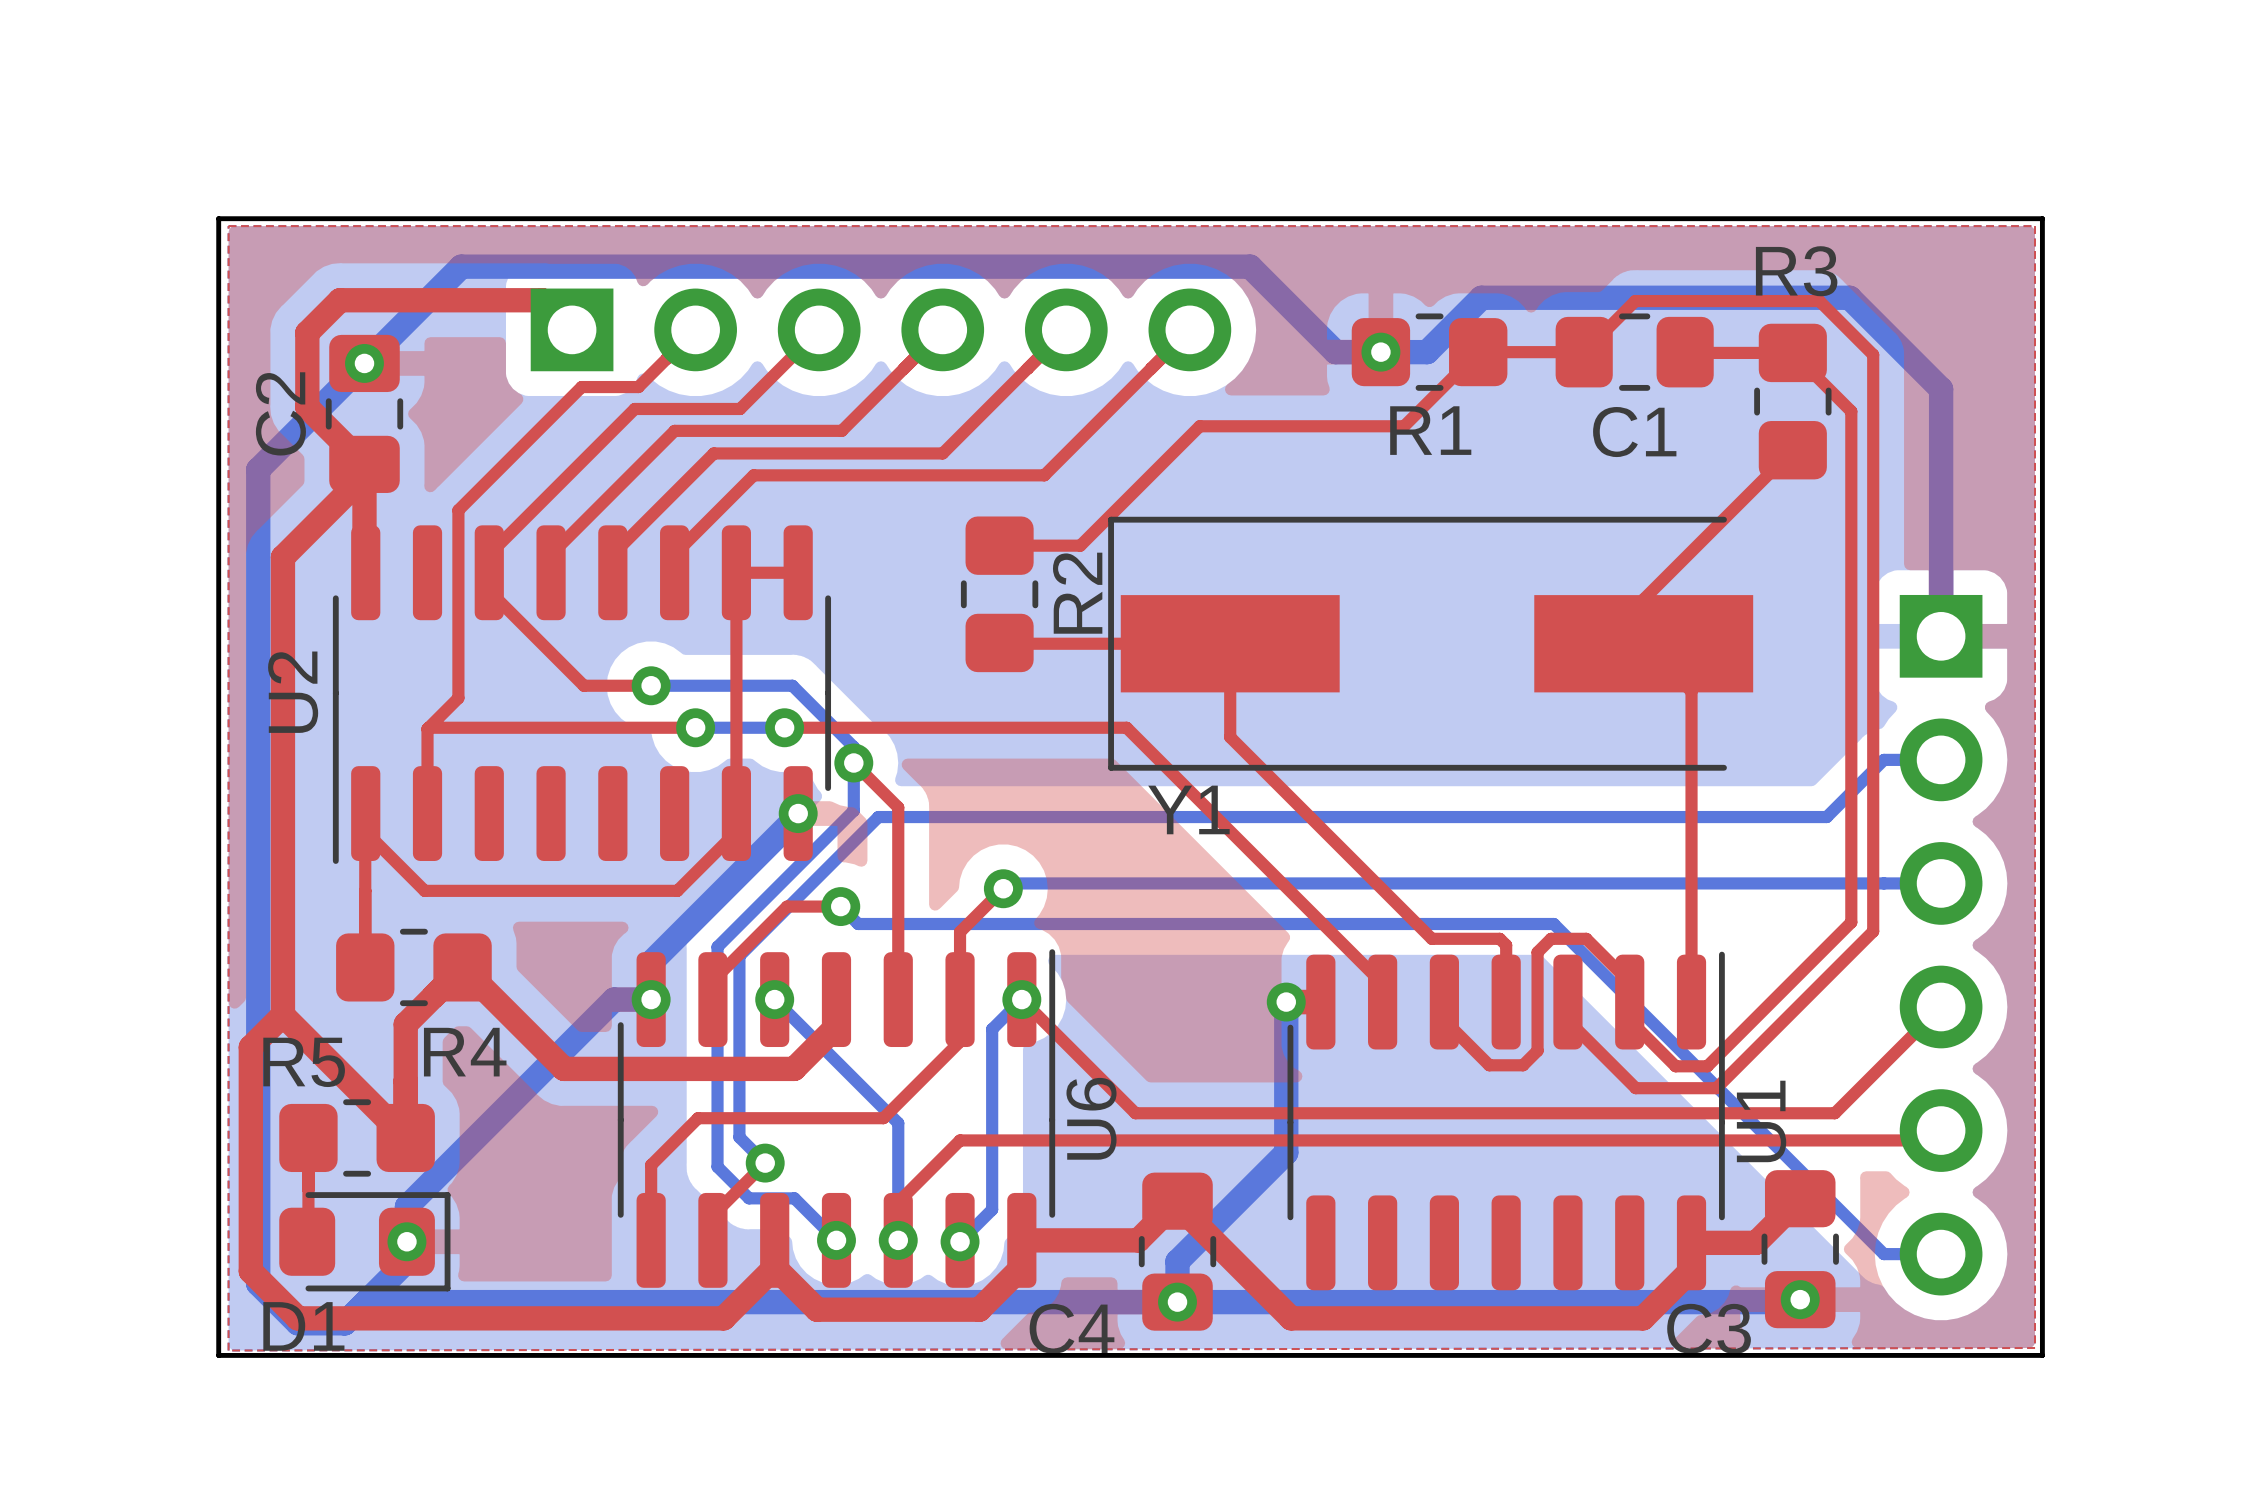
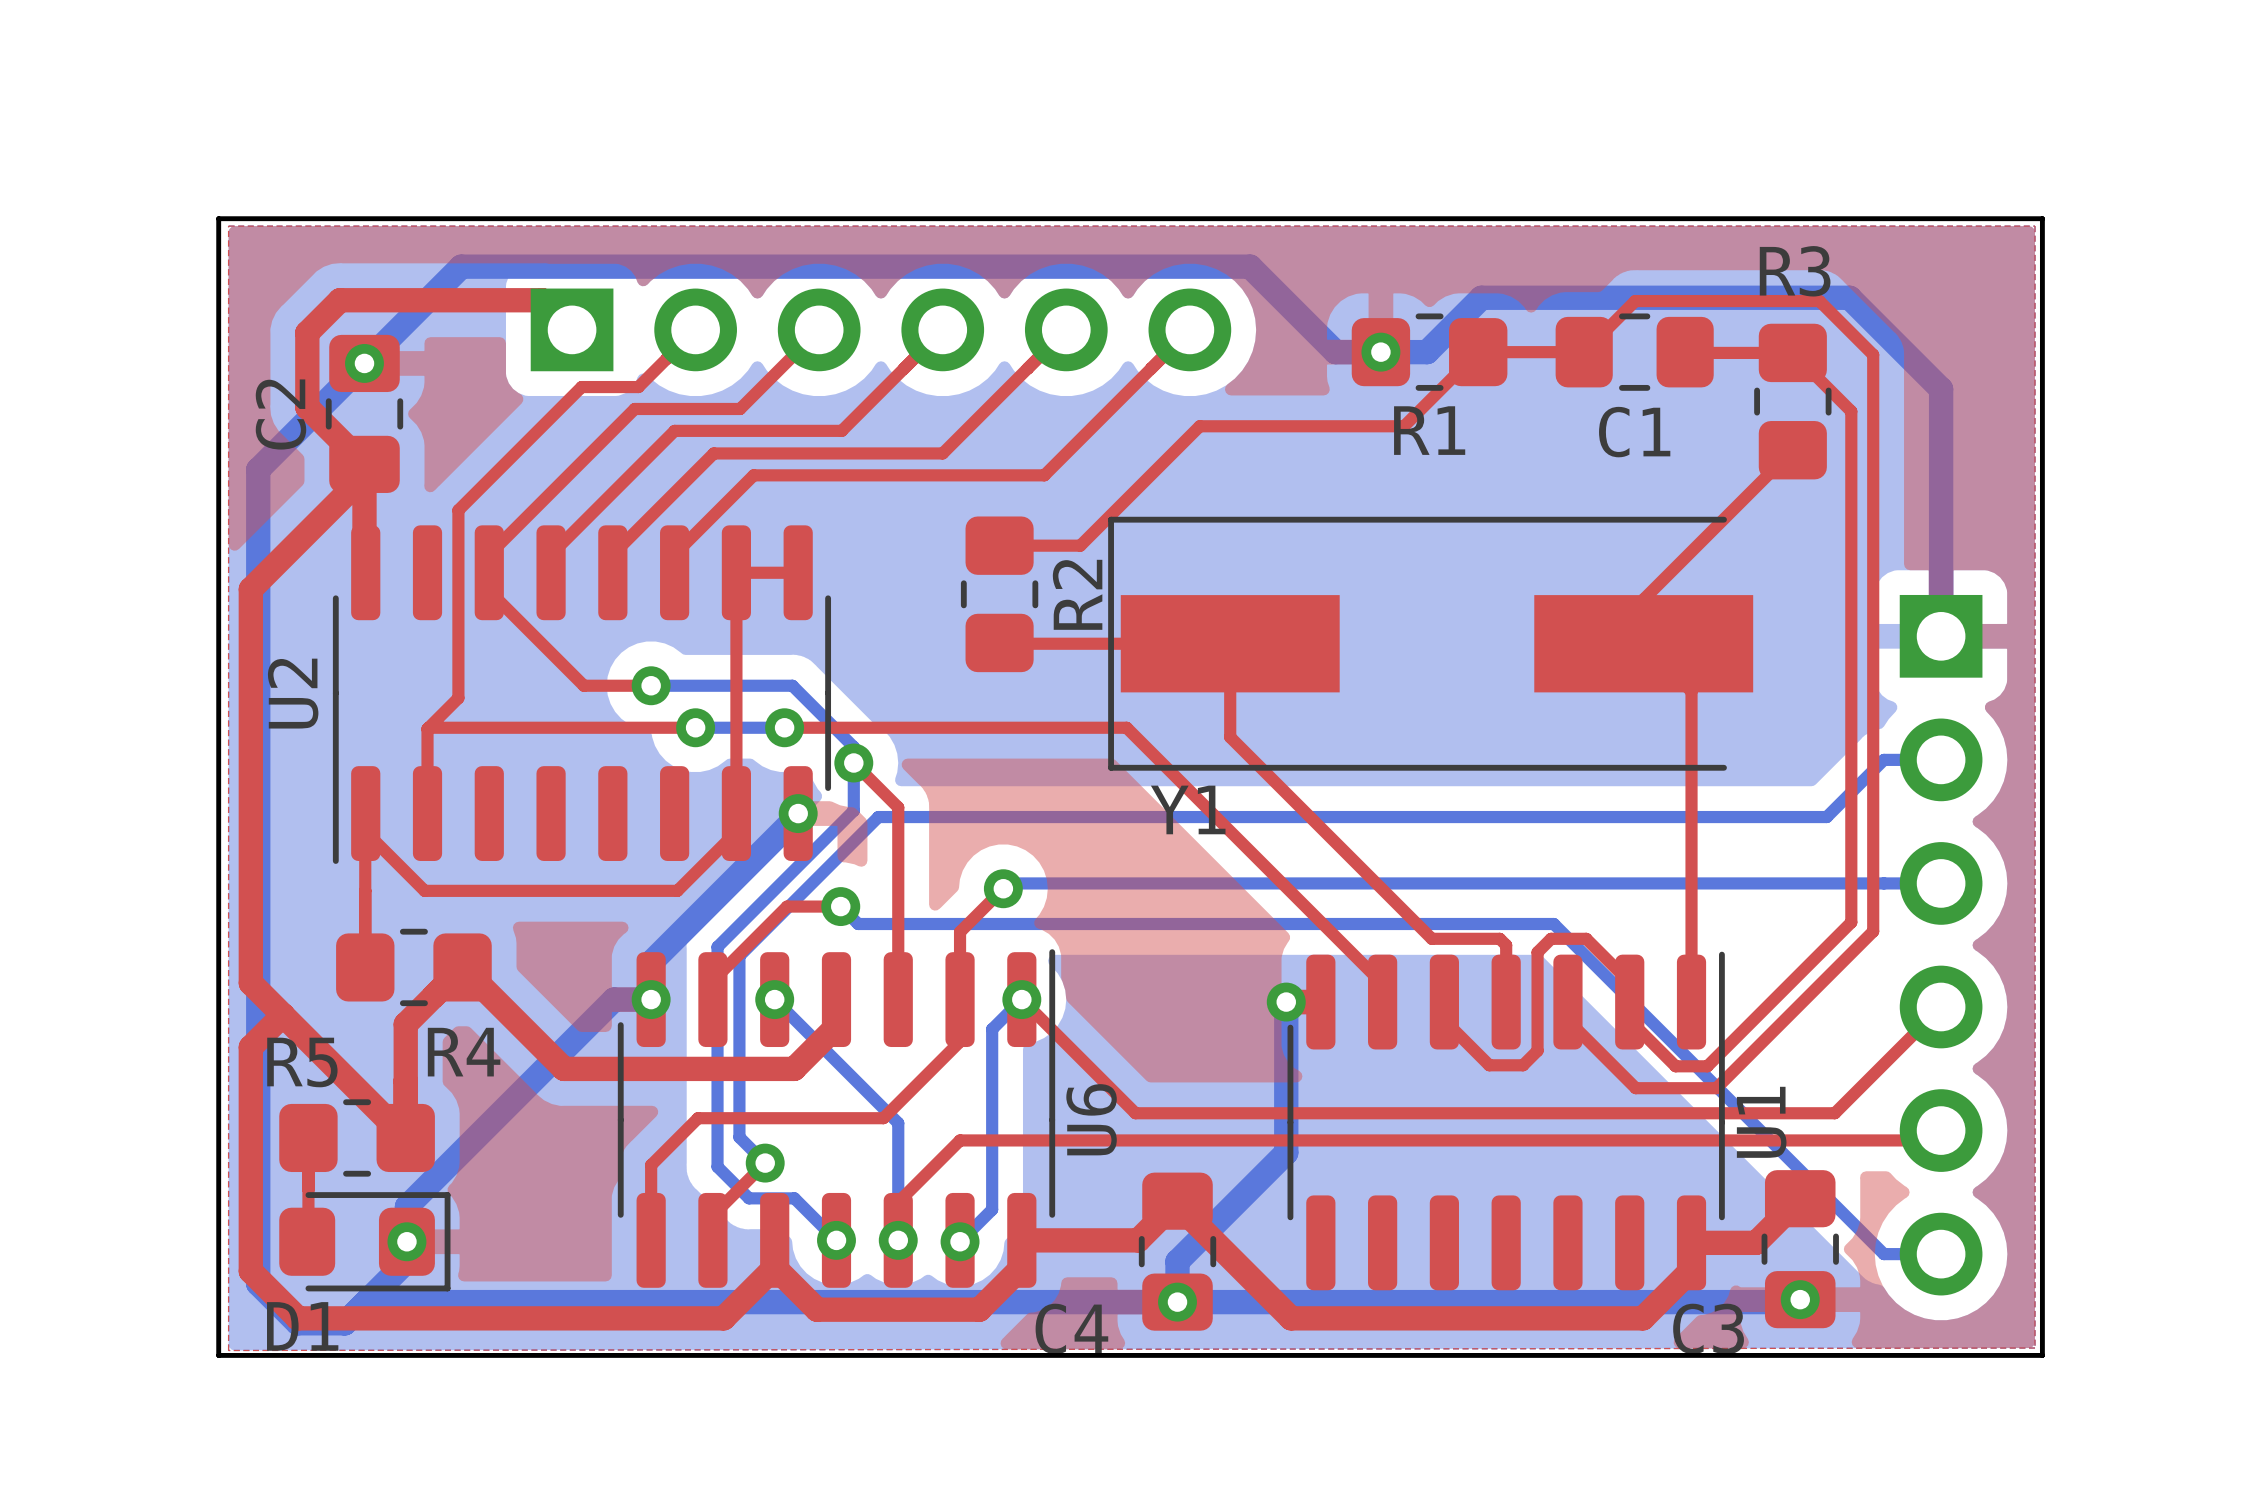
top track: (364, 475) (282, 557) (282, 1015) -> (364, 475) (250, 589) (250, 983) (282, 1015)

